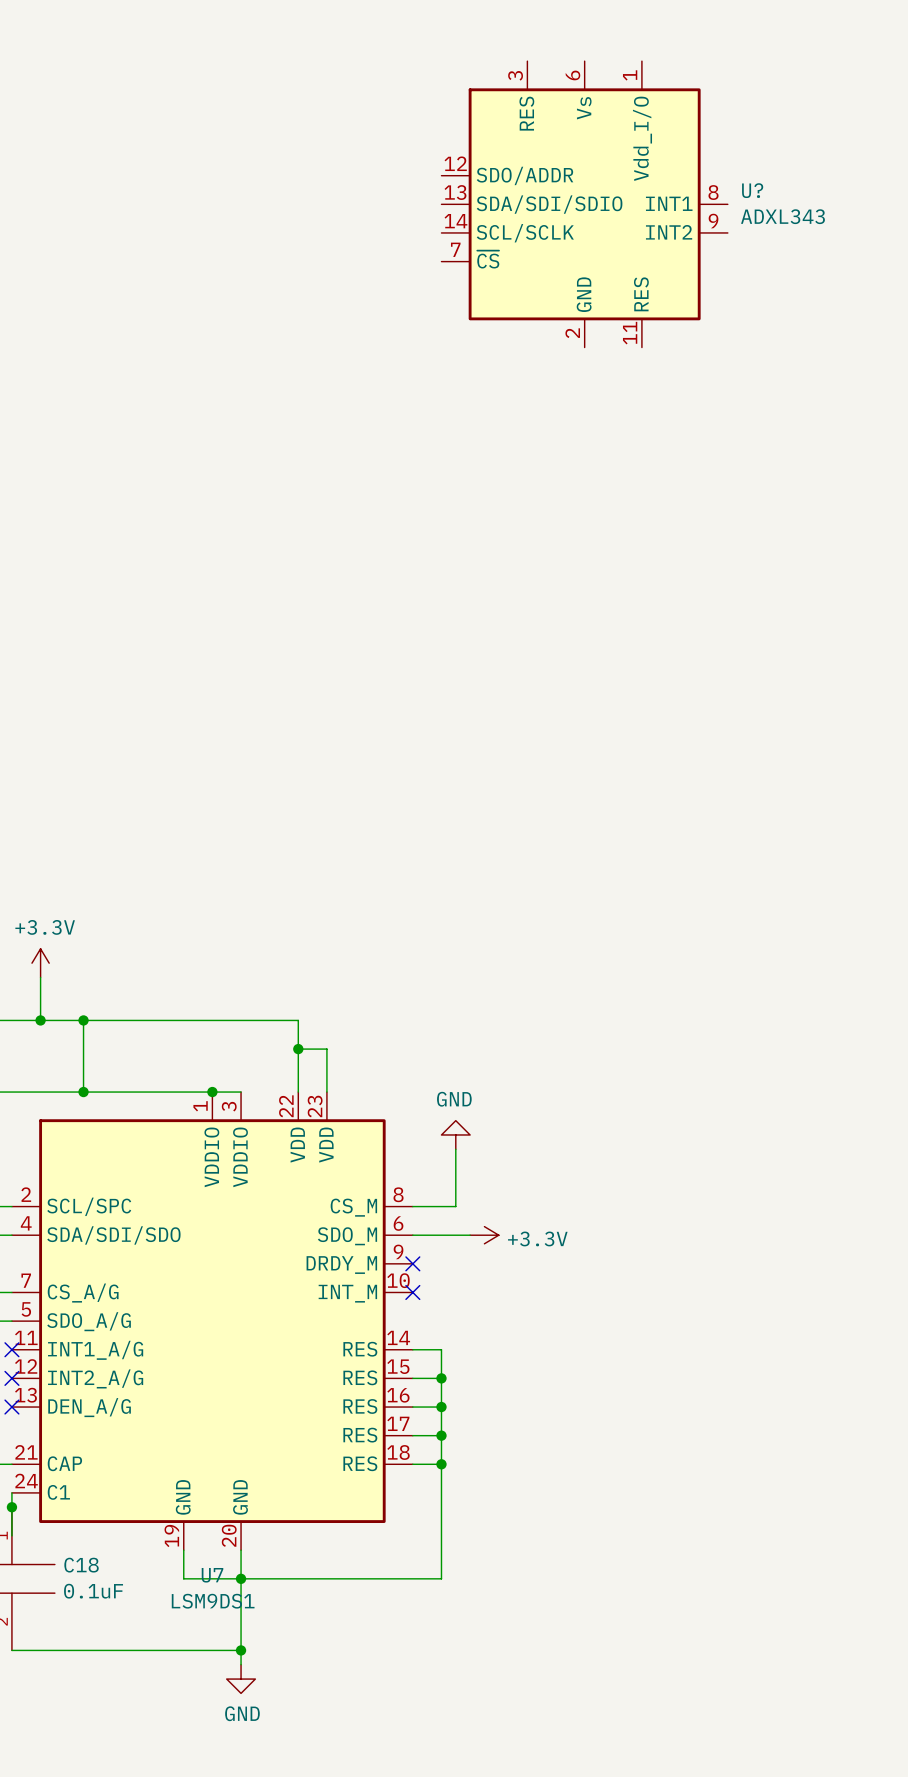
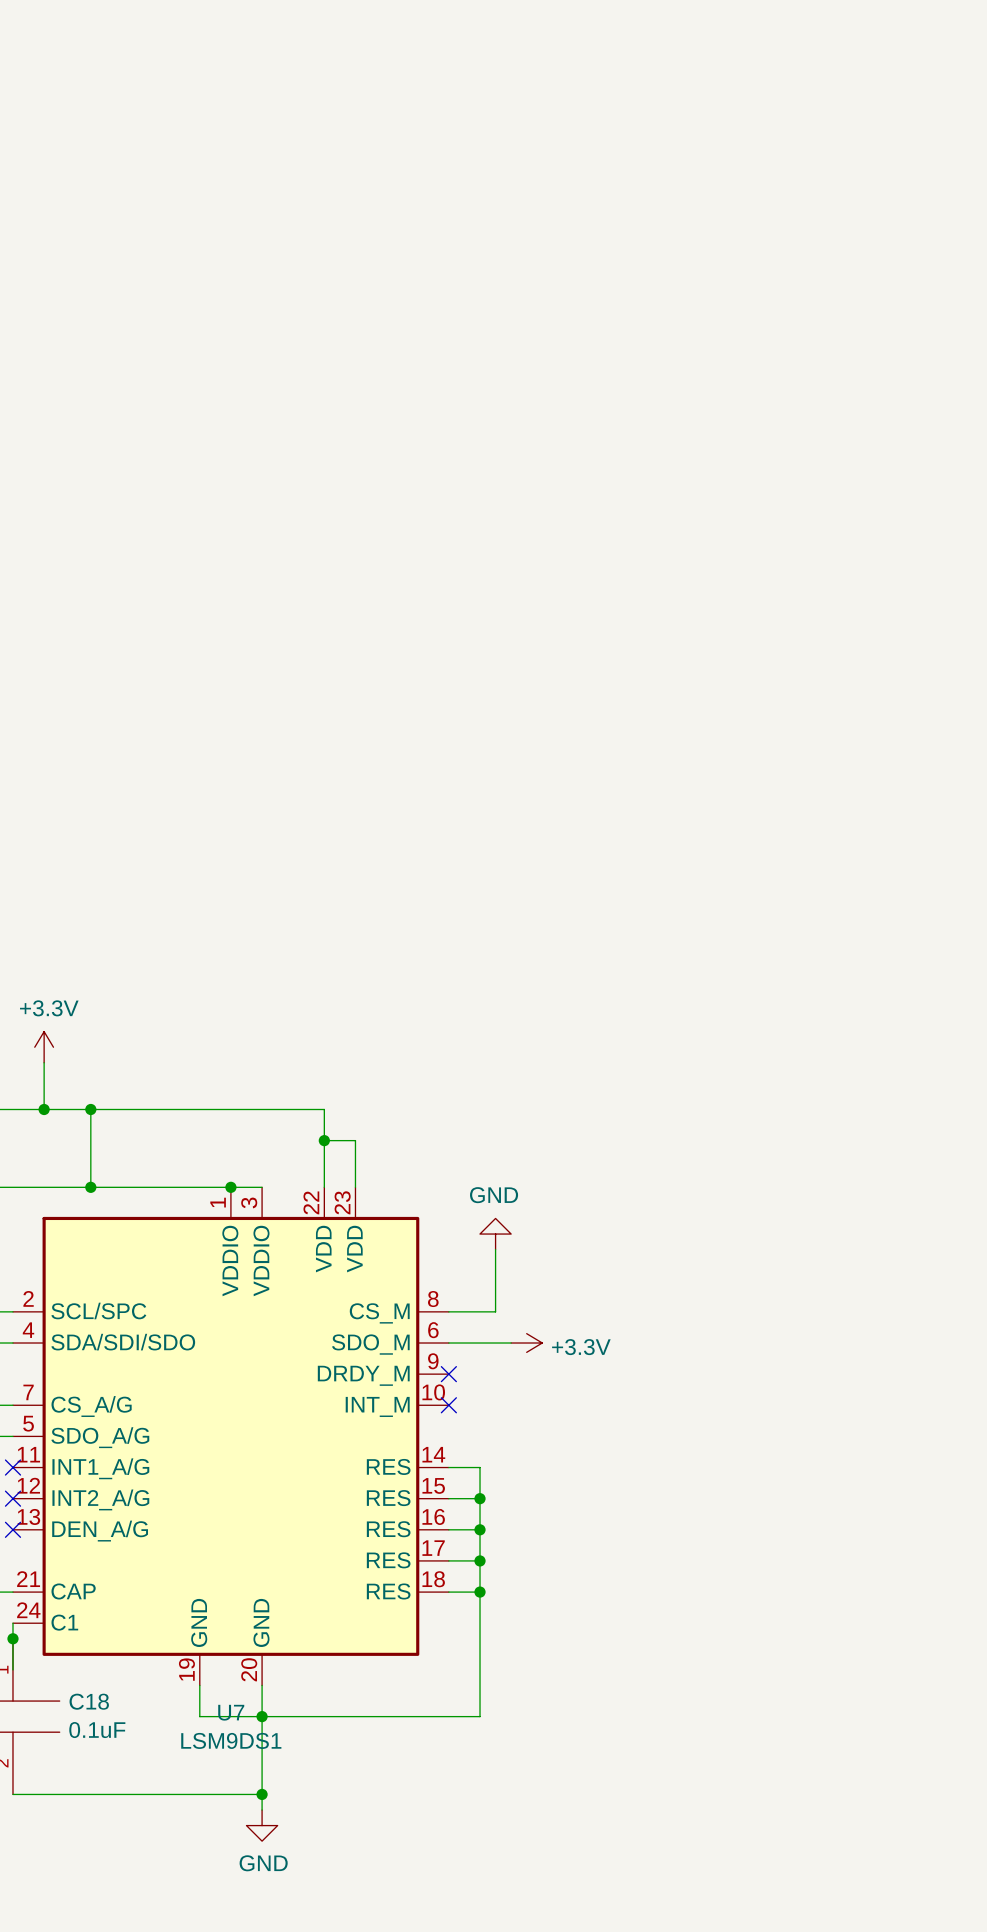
U?: ADXL343 (584, 204) -> none

